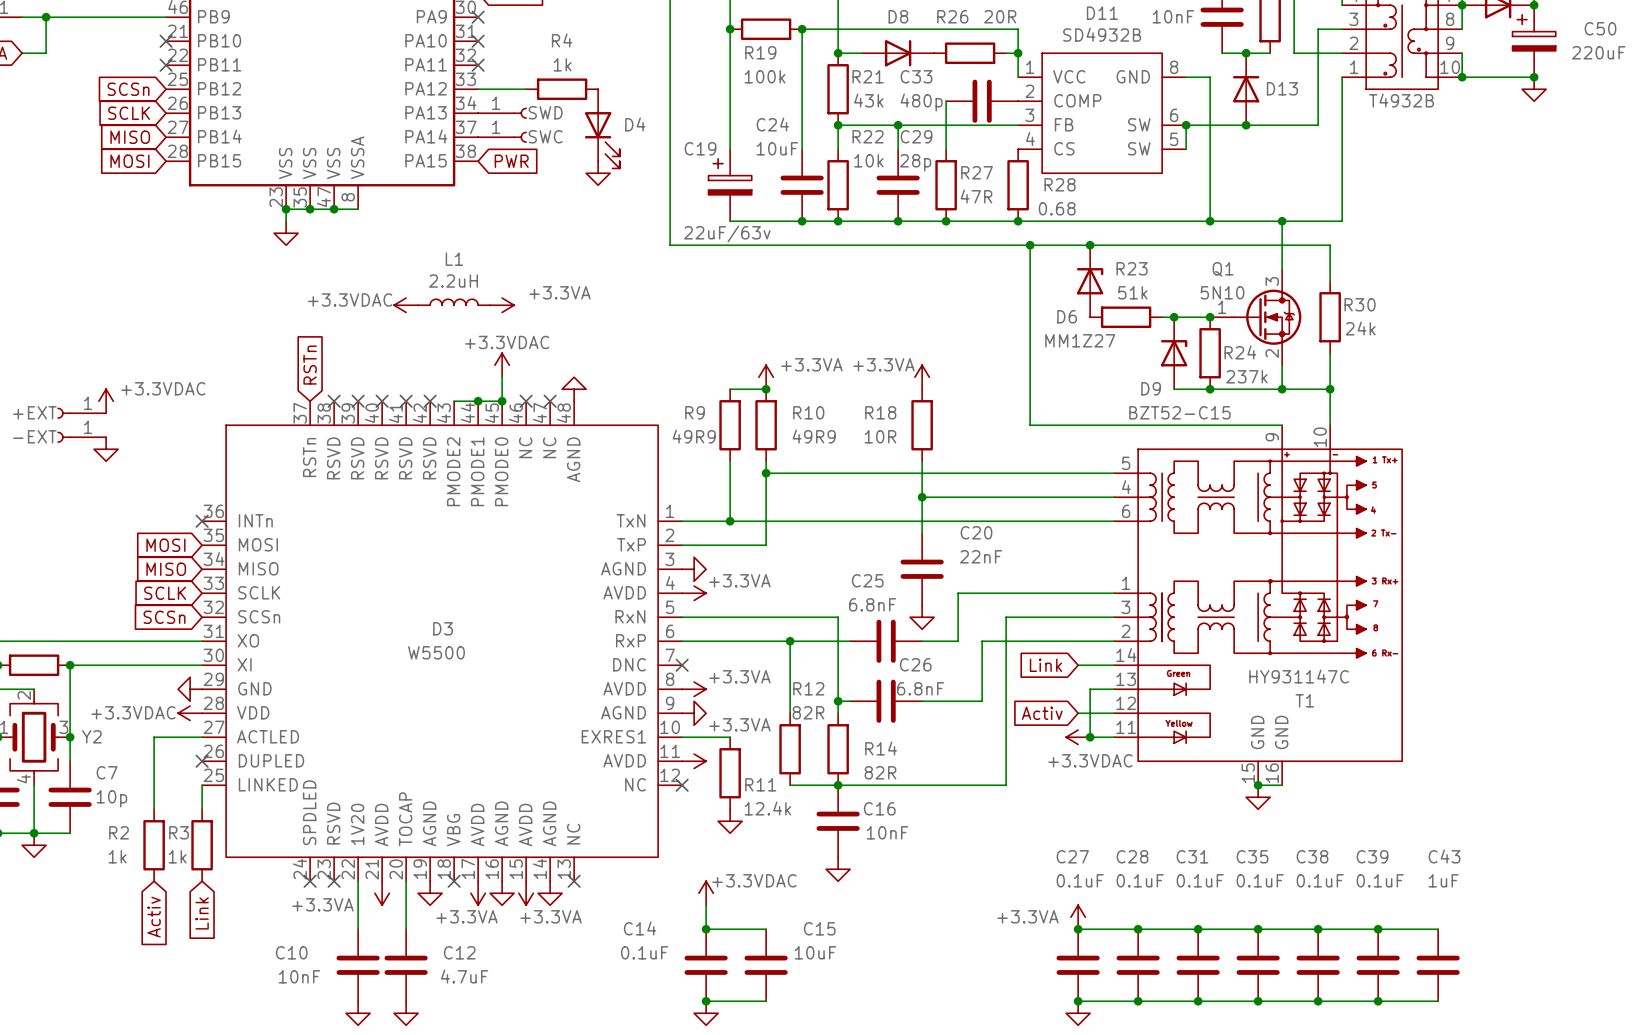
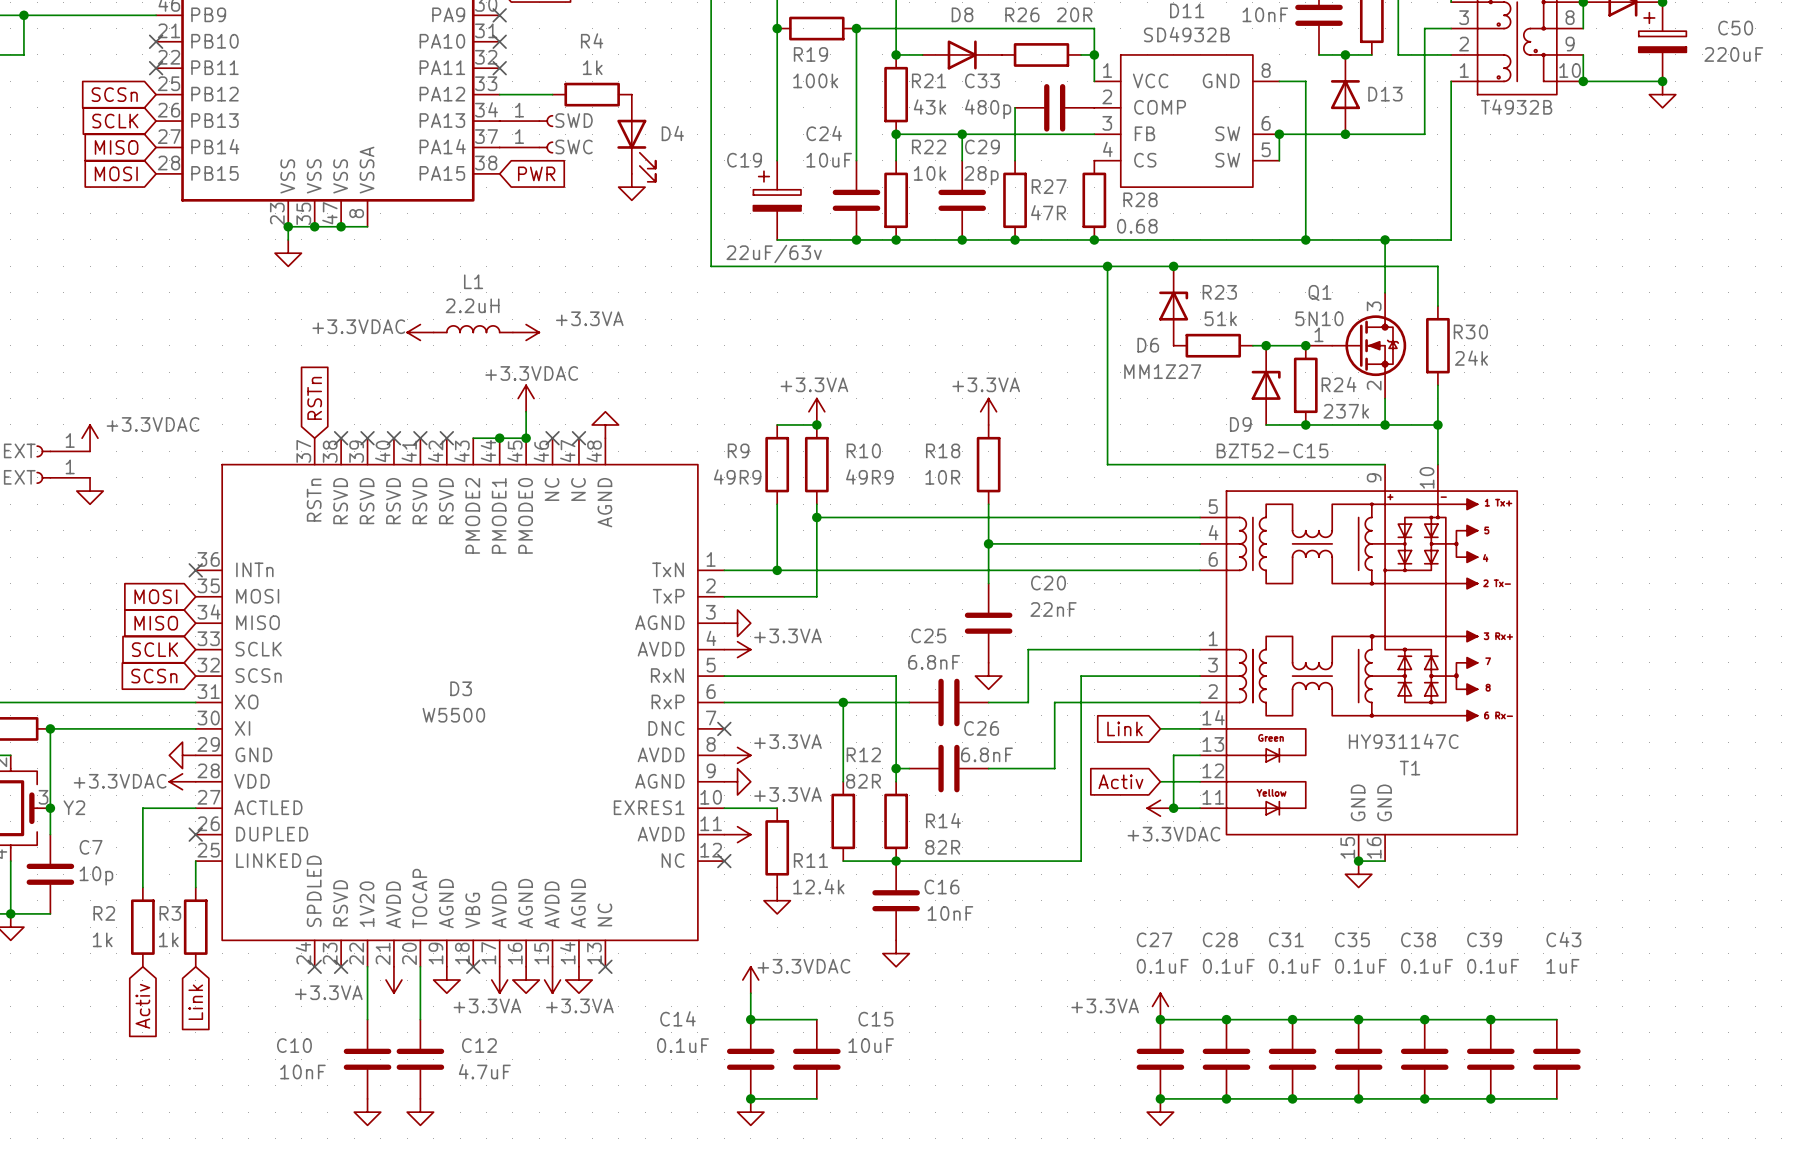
power symbol text position: +3.3VA (811, 364) -> +3.3VA (814, 384)
power symbol text position: +3.3VA (883, 364) -> +3.3VA (986, 384)

